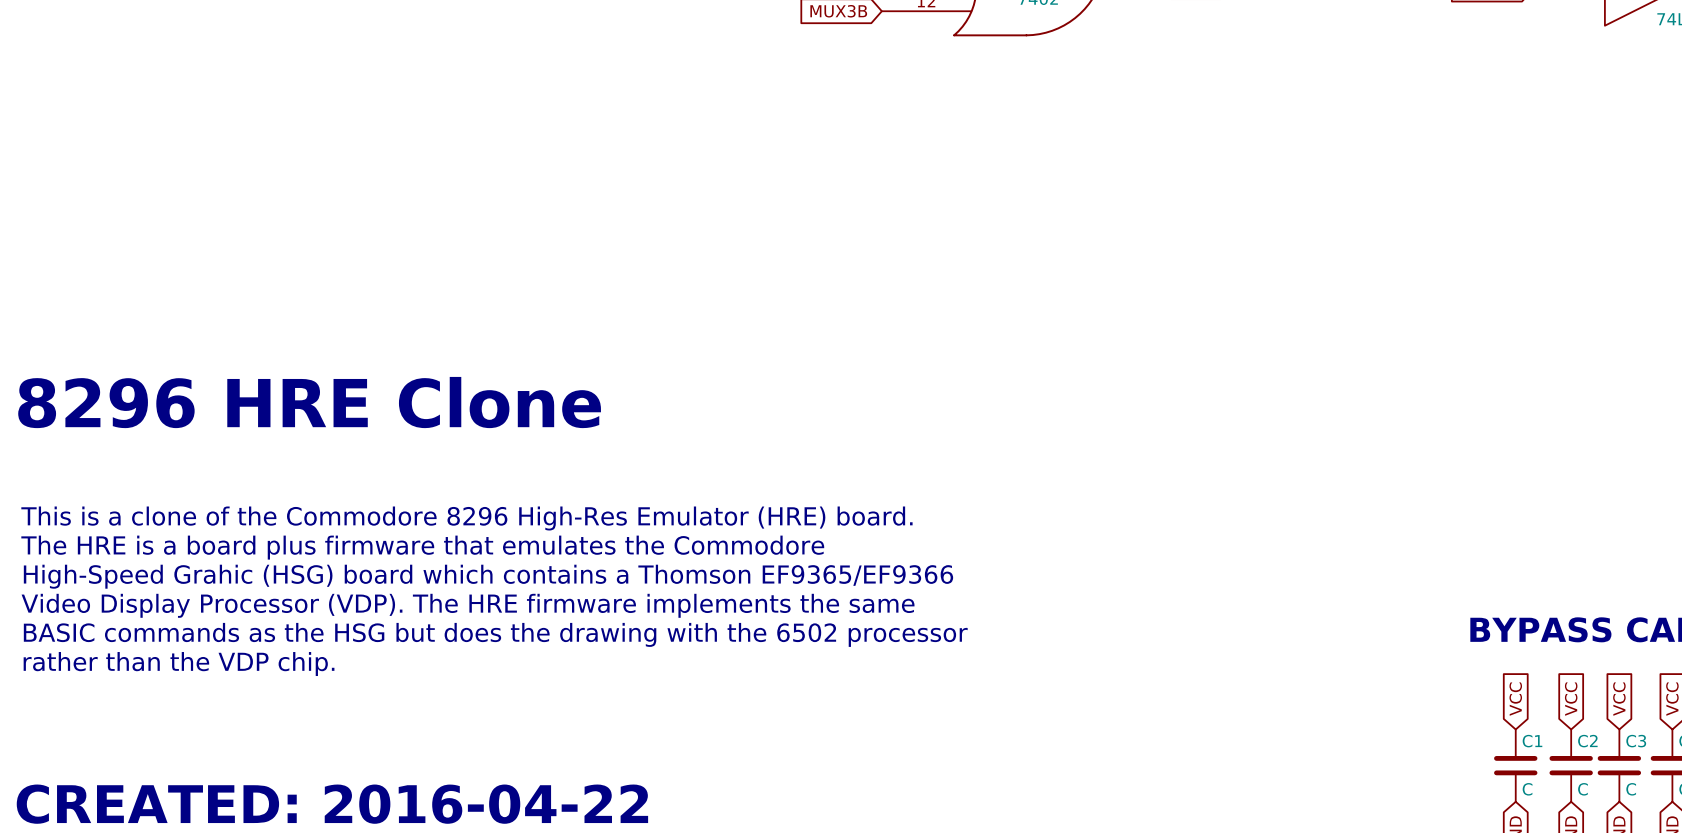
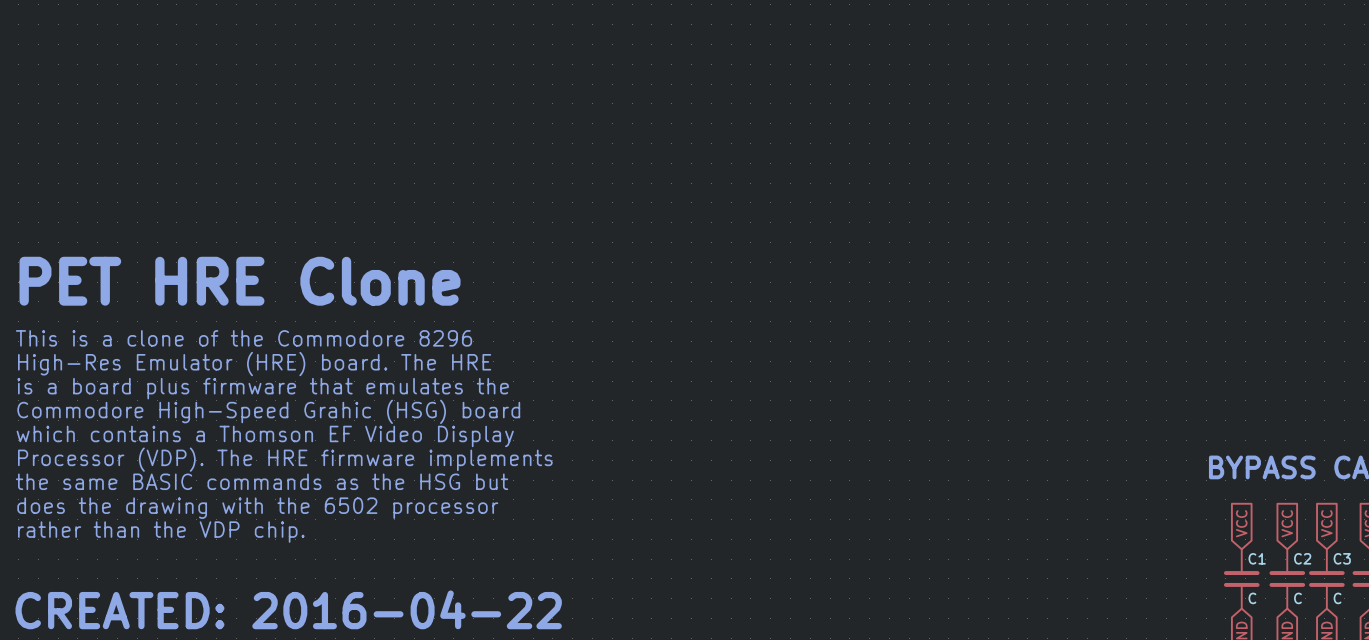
text: 8296 HRE Clone (309, 402) -> PET HRE Clone (240, 281)
text: none -> This is a clone of the Commodore 8296 (244, 338)
text: none -> High-Res Emulator (HRE) board. The HRE (254, 364)
text: This is a clone of the Commodore 8296 High-Res Emulator (HRE) board. (466, 518) -> none
text: The HRE is a board plus firmware that emulates the Commodore (422, 547) -> is a board plus firmware that emulates the (263, 388)
text: none -> Commodore High-Speed Grahic (HSG) board (268, 411)
text: High-Speed Grahic (HSG) board which contains a Thomson EF9365/EF9366 (488, 576) -> none
text: none -> which contains a Thomson EF Video Display (265, 436)
text: Video Display Processor (VDP). The HRE firmware implements the same (468, 605) -> Processor (VDP). The HRE firmware implements (285, 459)
text: BASIC commands as the HSG but does the drawing with the 6502 processor (495, 634) -> none
text: none -> the same BASIC commands as the HSG but (262, 481)
text position: rather than the VDP chip. (179, 664) -> rather than the VDP chip. (161, 532)
text: none -> does the drawing with the 6502 processor (257, 508)

